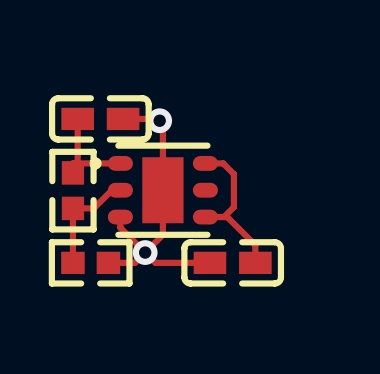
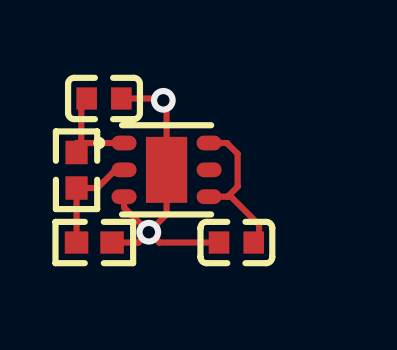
part footprint: [48, 95, 152, 143] -> [64, 74, 144, 123]
part footprint: [181, 239, 285, 287] -> [197, 218, 276, 267]

